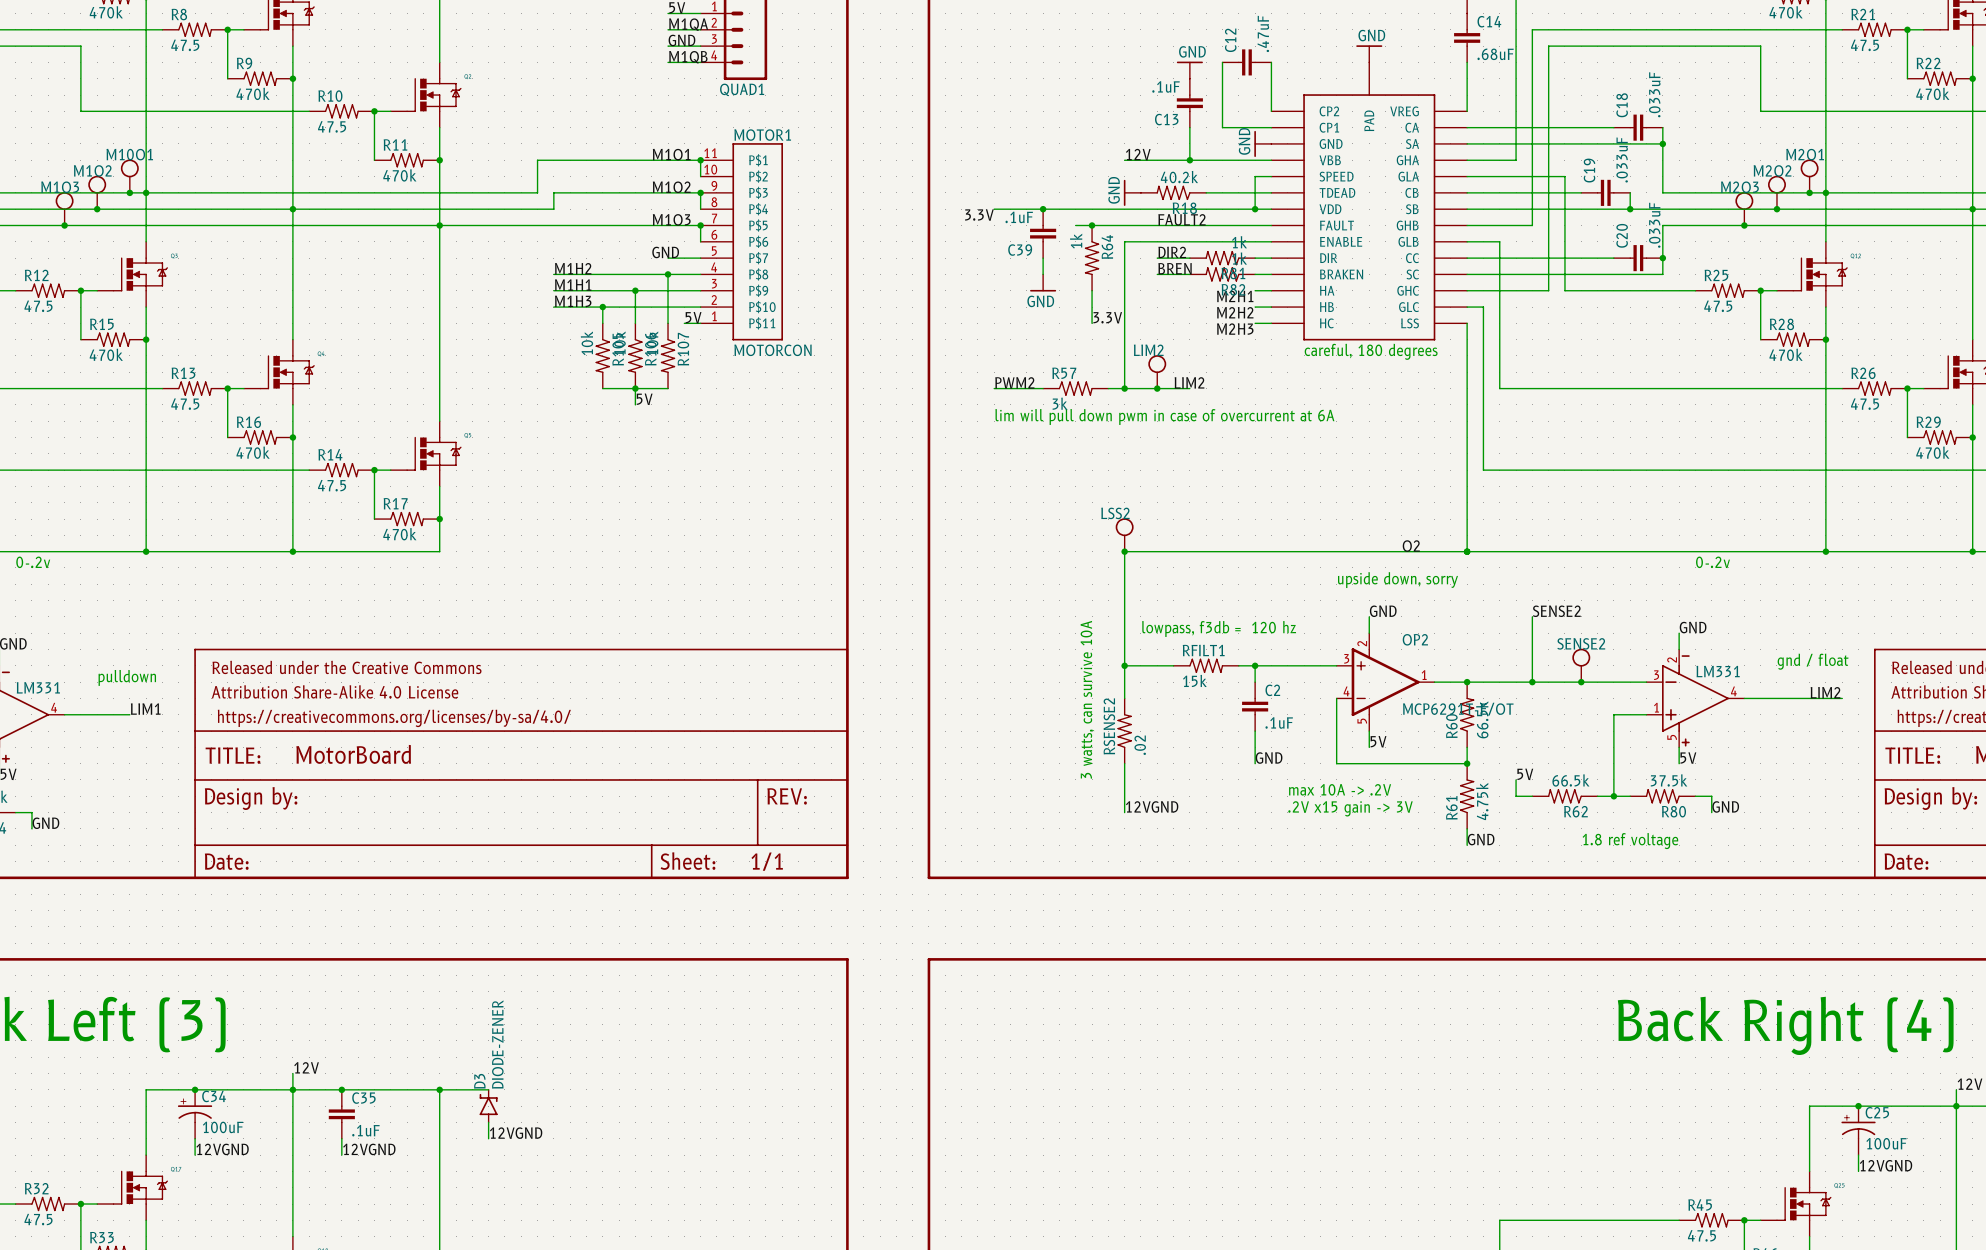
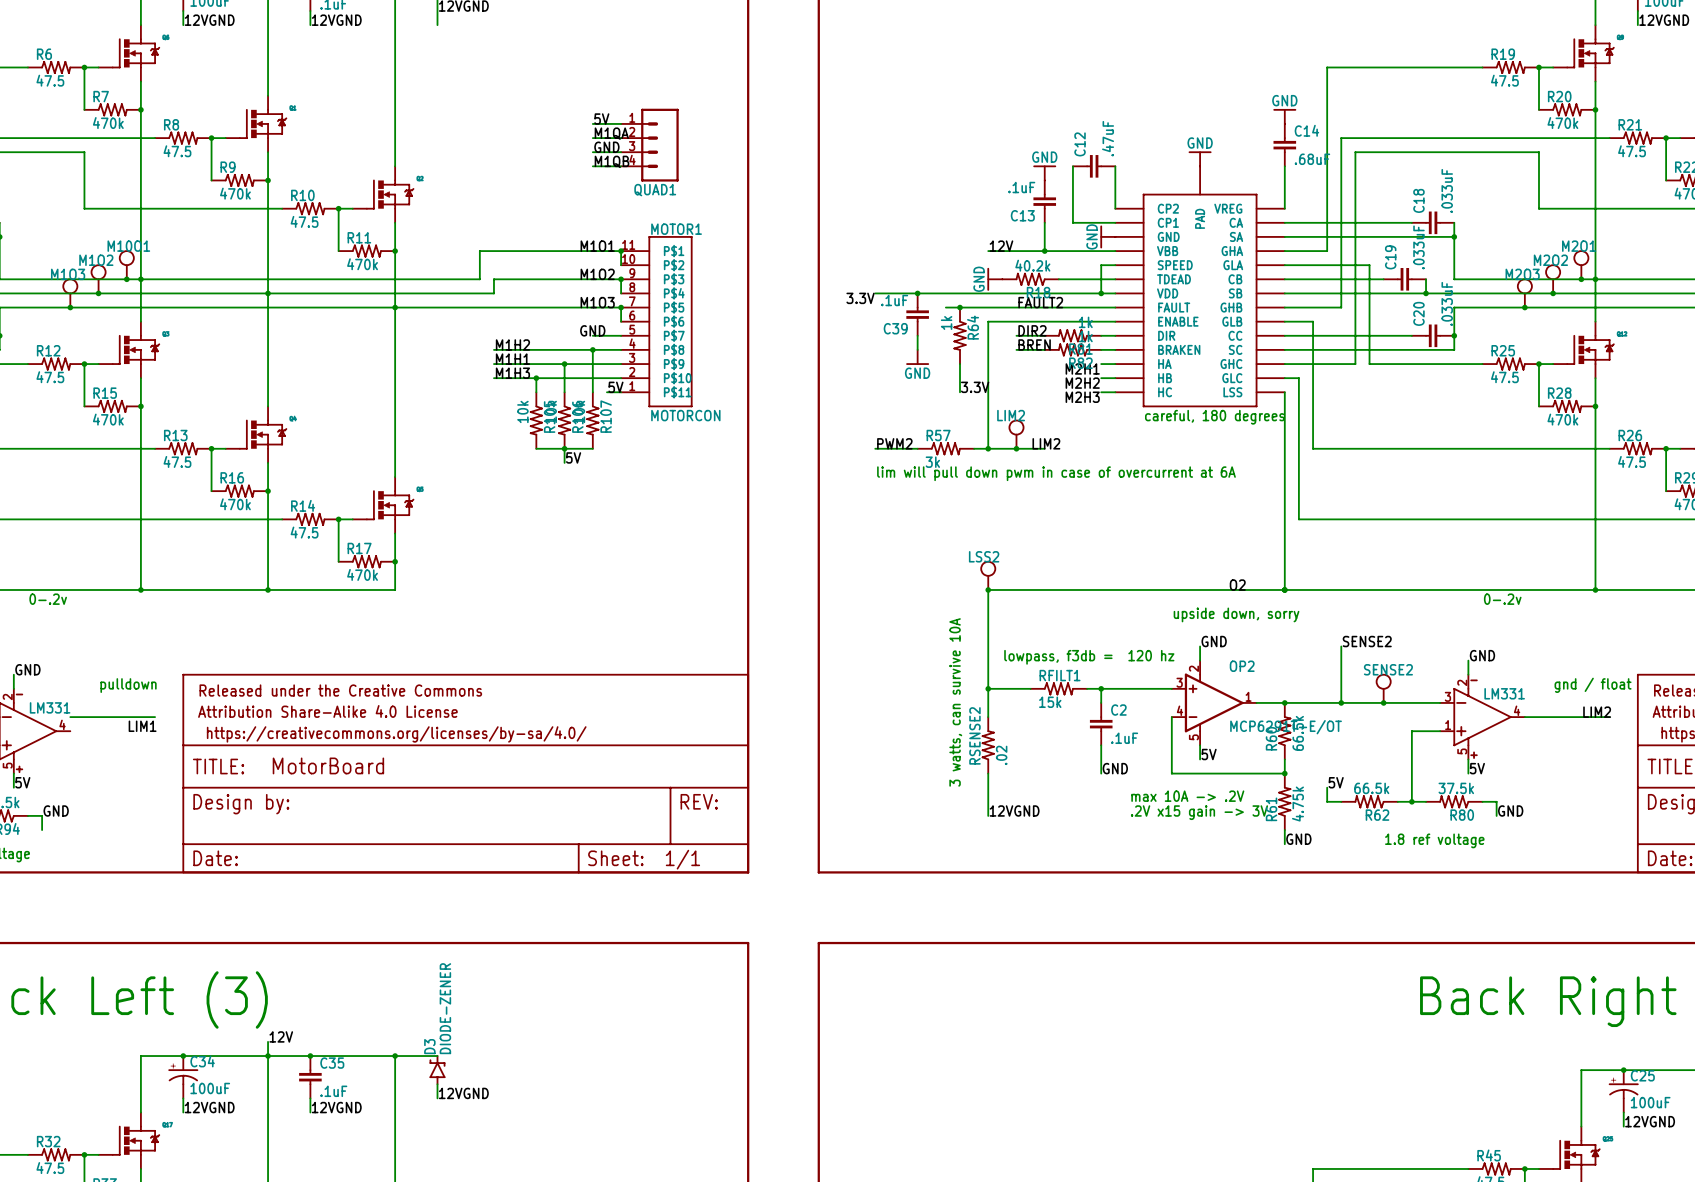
text position: pulldown (127, 677) -> pulldown (128, 685)
wire: none -> (70, 717) (155, 717)
wire: (64, 714) (129, 714) -> none
label position: GND (45, 823) -> GND (56, 810)

